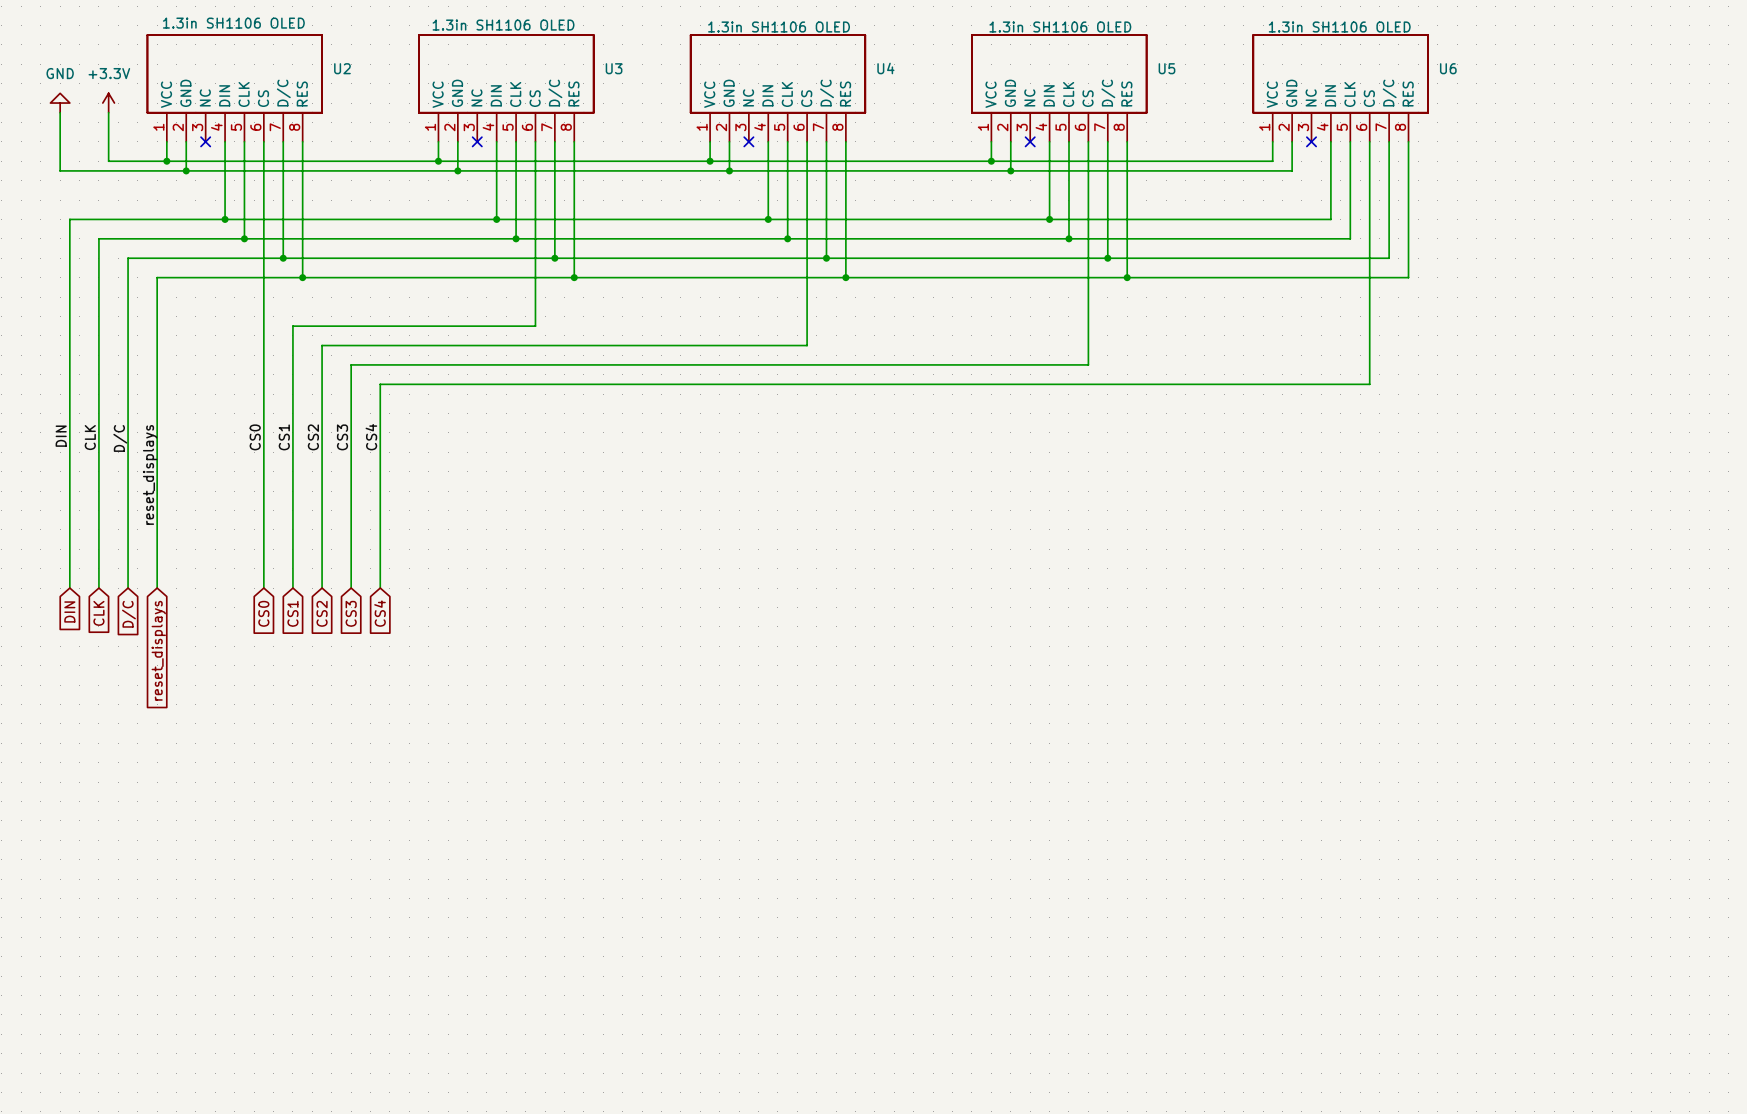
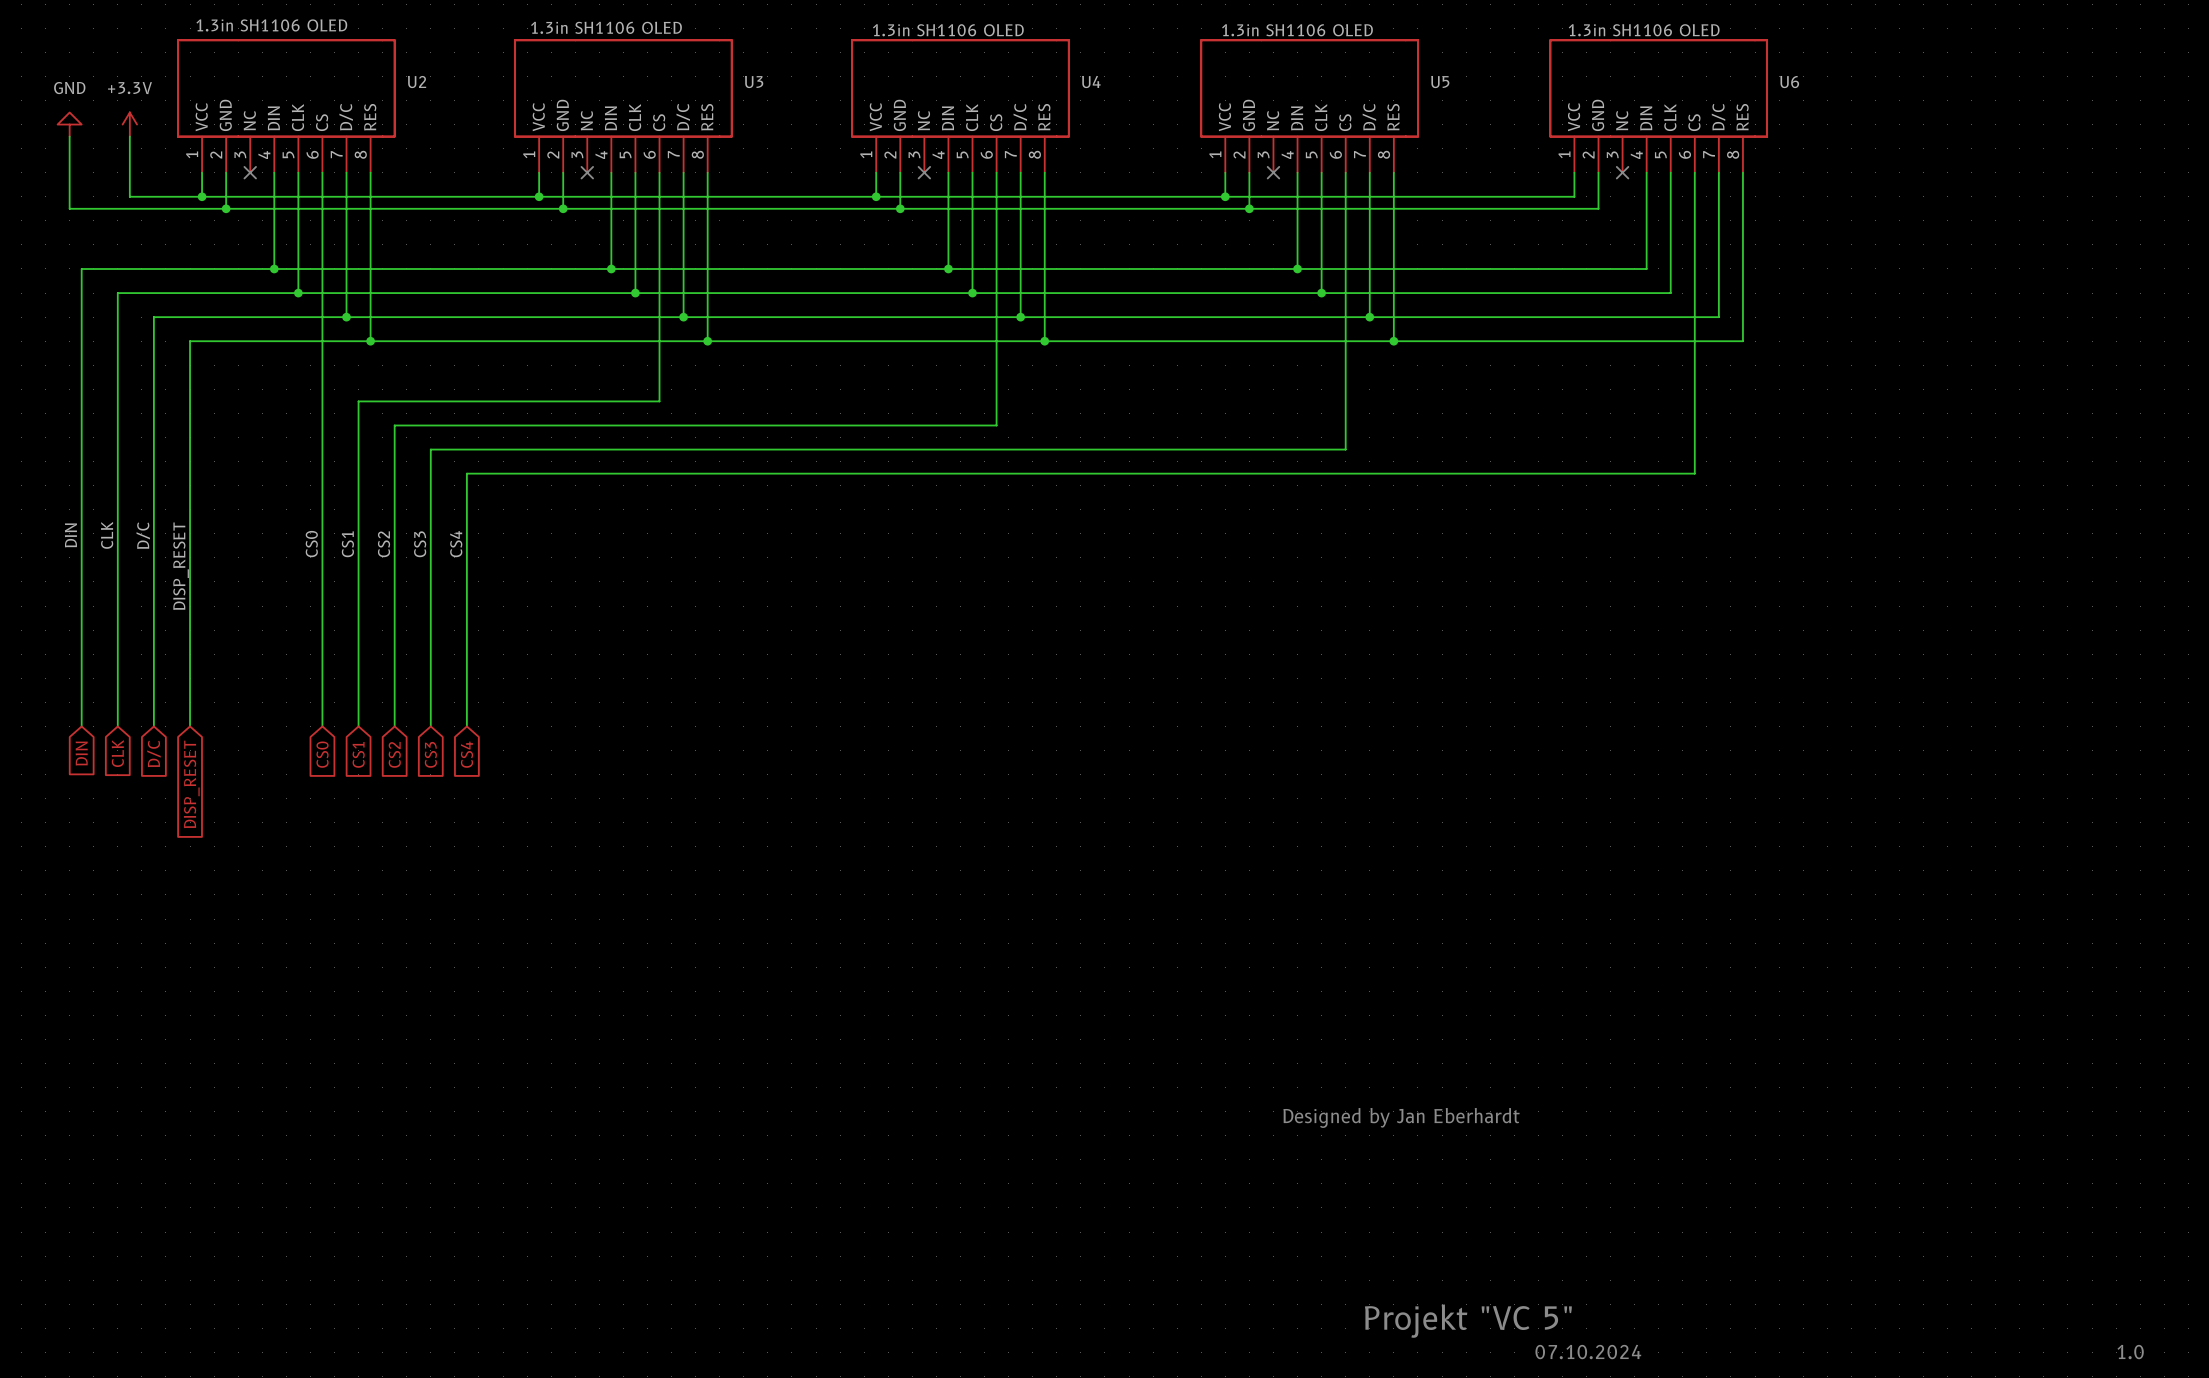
label: reset_displays (150, 474) -> DISP_RESET (181, 566)
global label: reset_displays (158, 650) -> DISP_RESET (191, 784)
text: none -> Designed by Jan Eberhardt (1401, 1117)
text: none -> Projekt "VC 5" (1468, 1321)
text: none -> 07.10.2024 (1588, 1352)
text: none -> 1.0 (2130, 1352)

